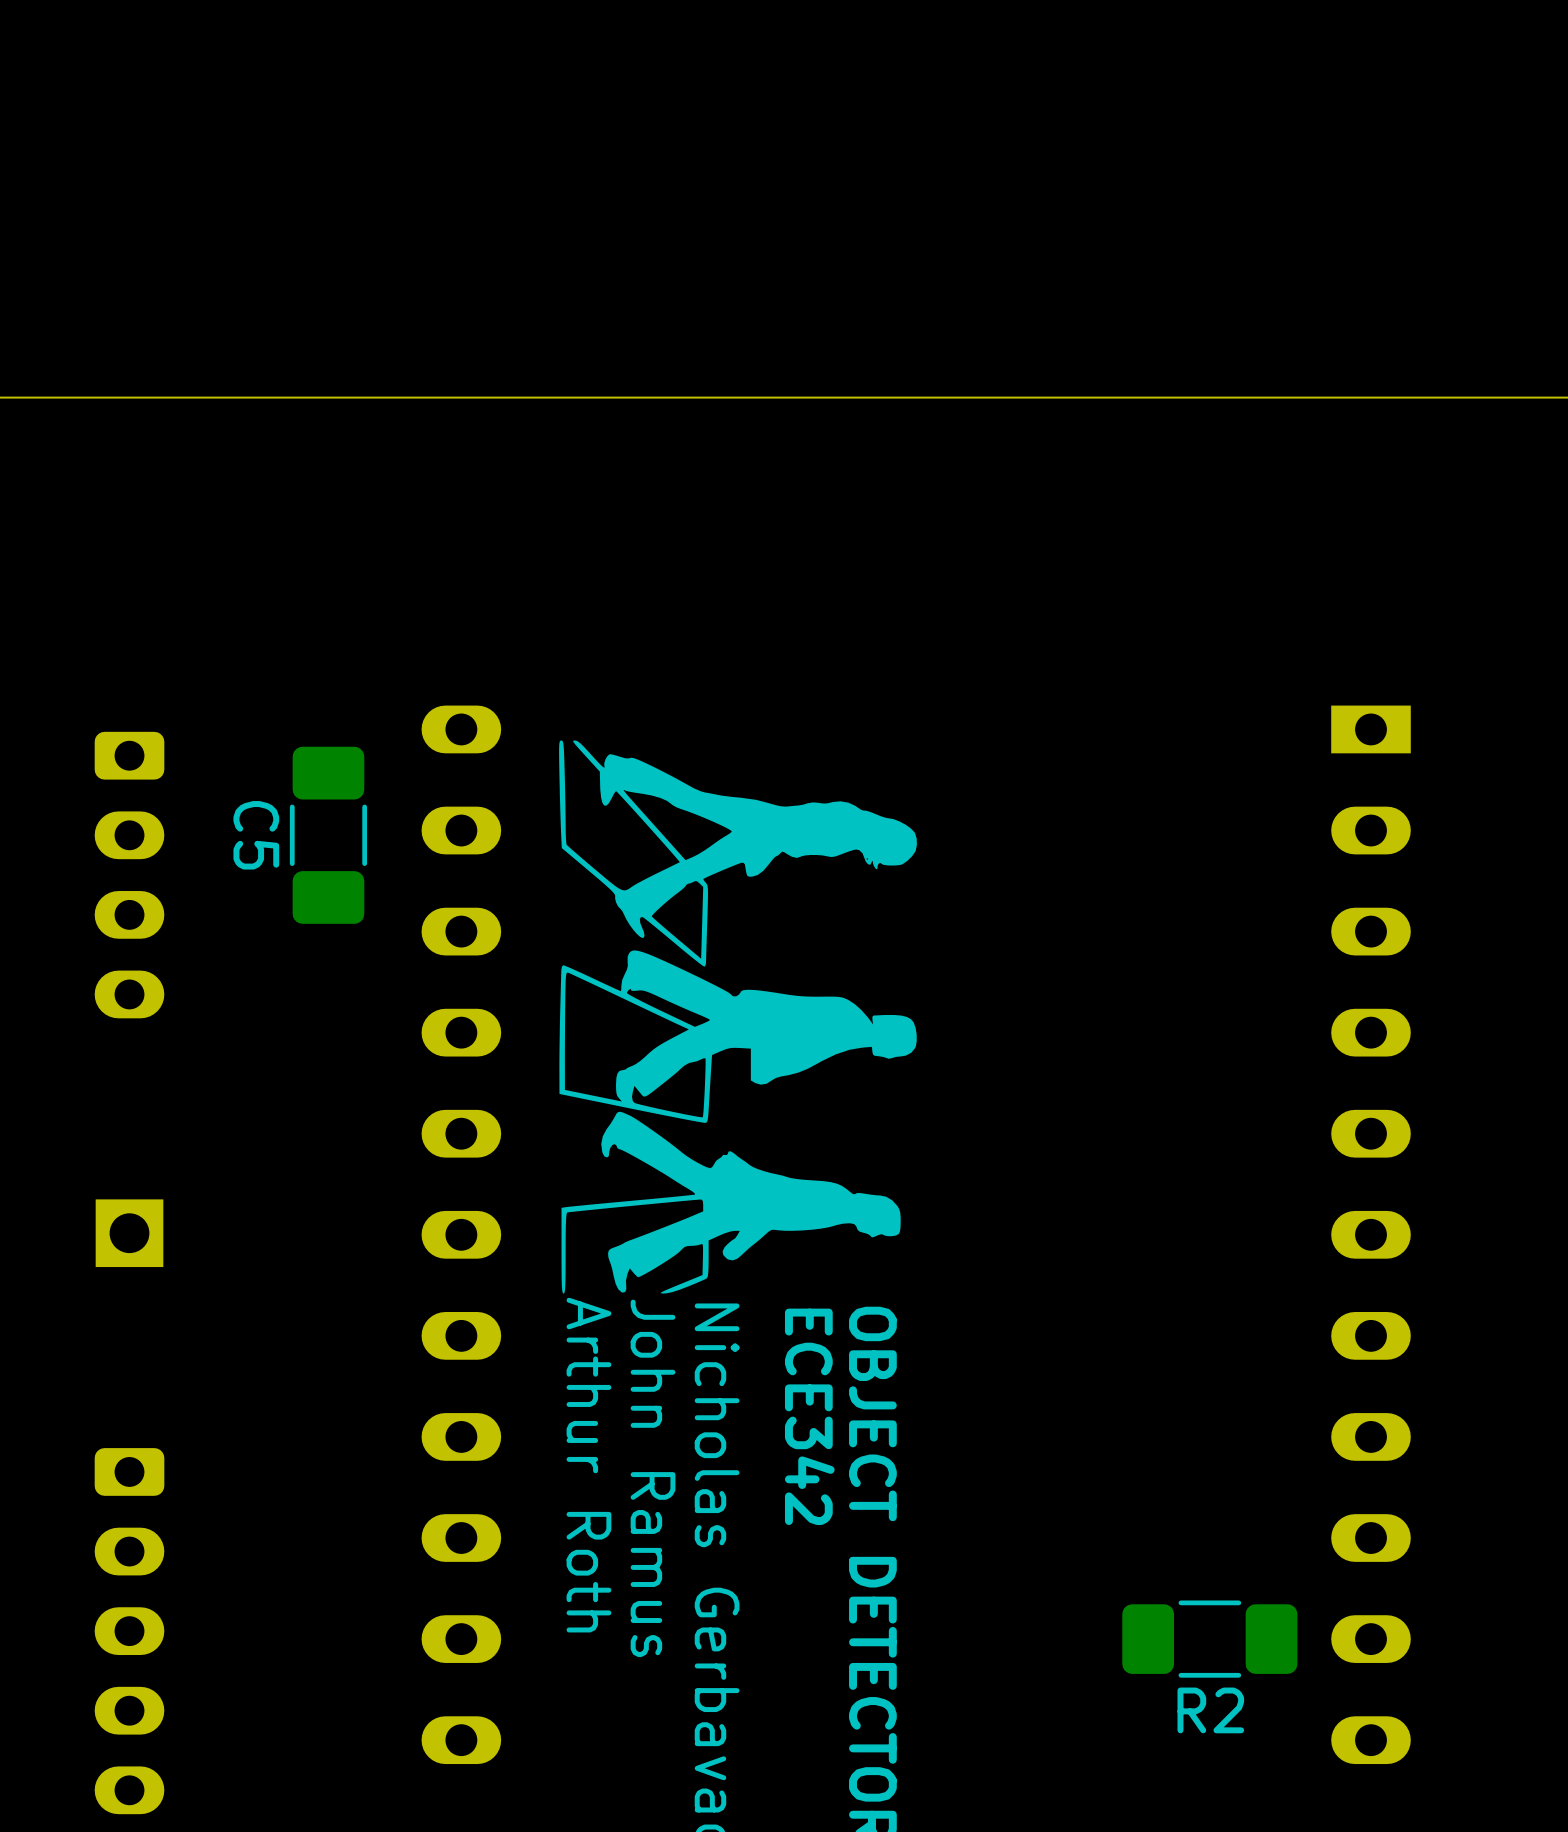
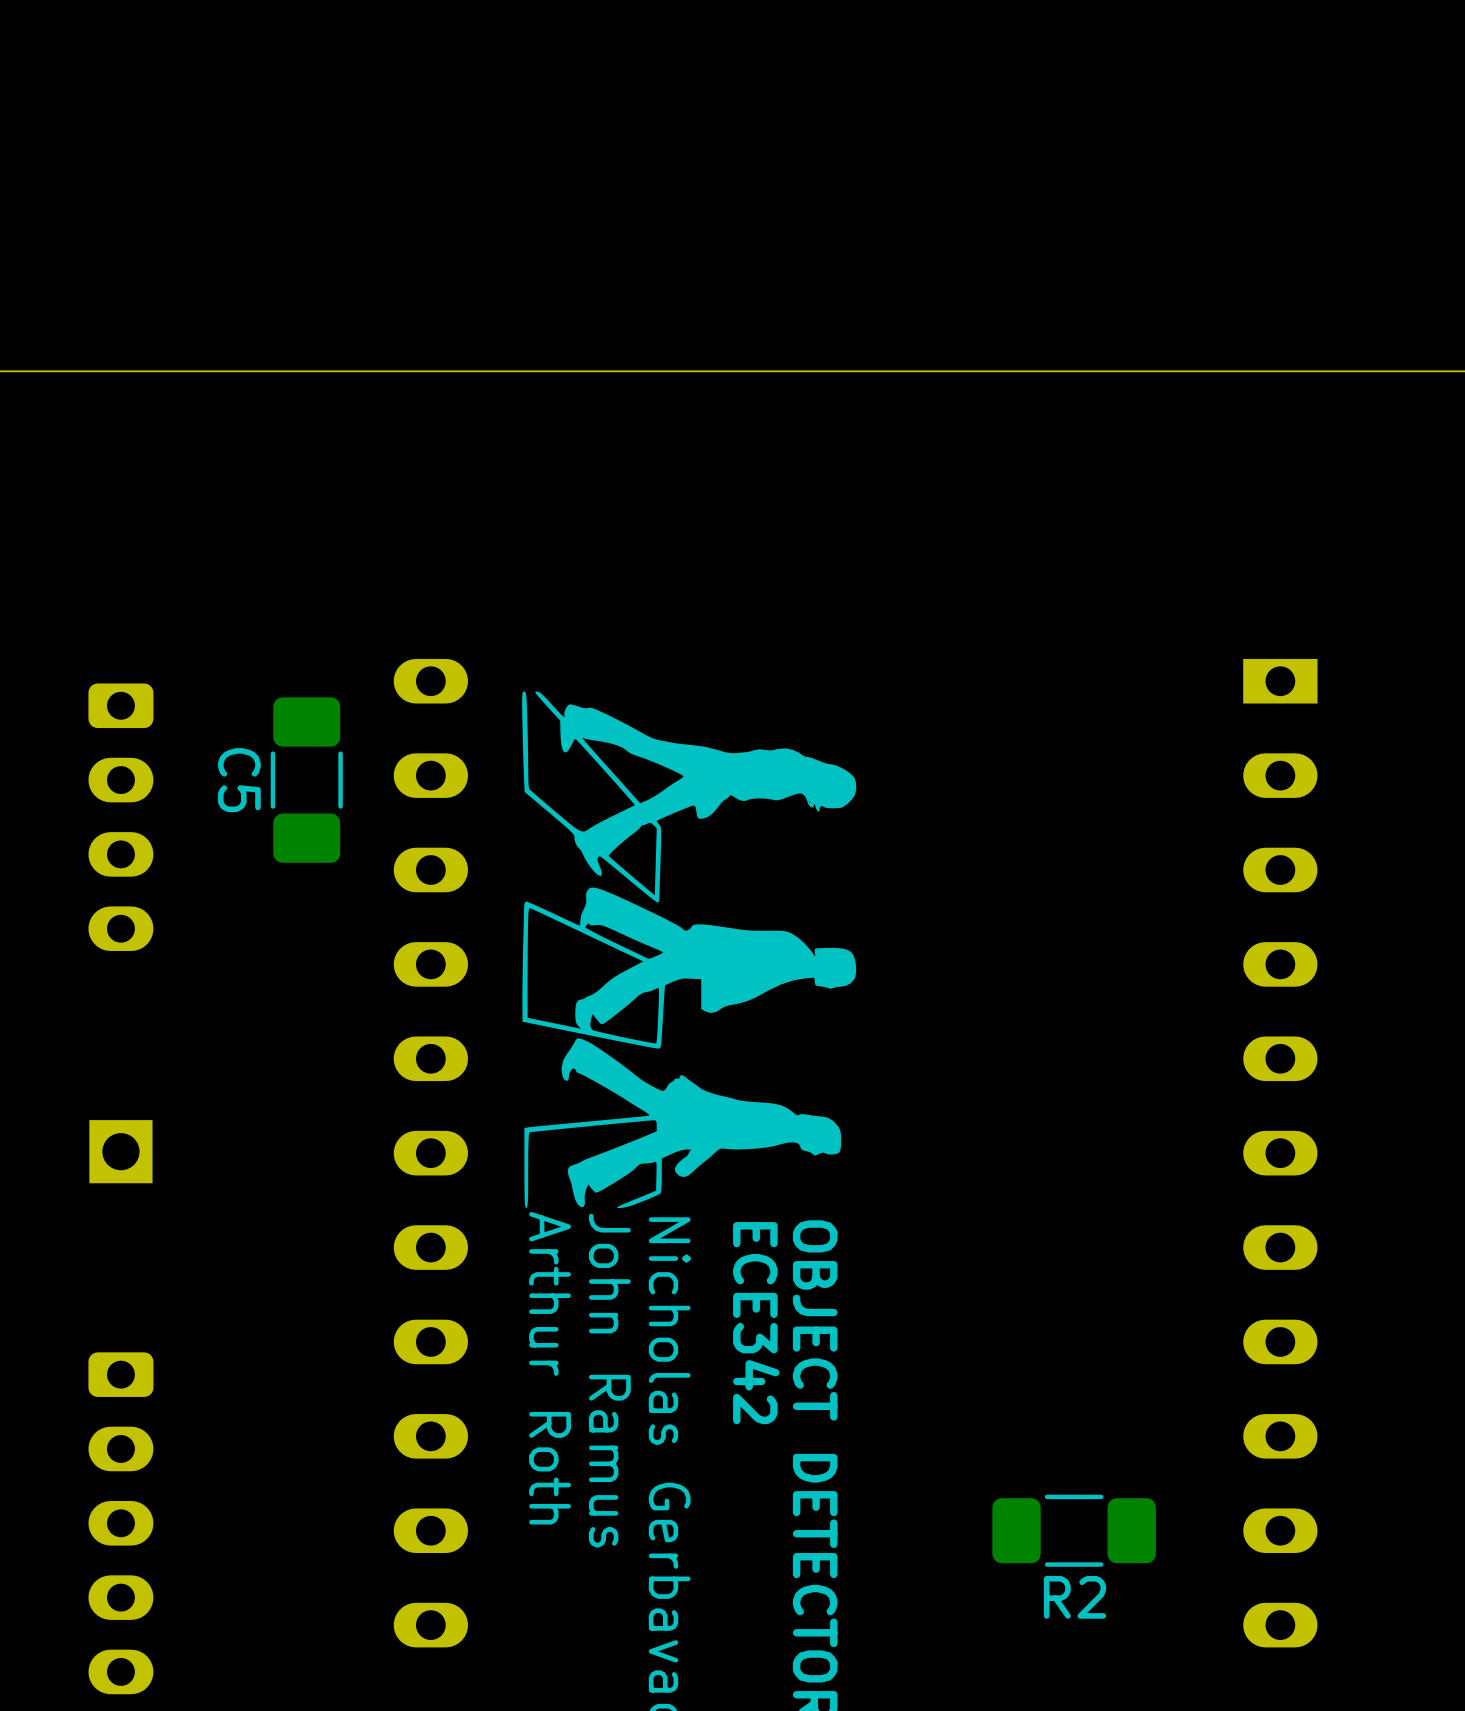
R2 position: (1209, 1639) -> (1074, 1530)

